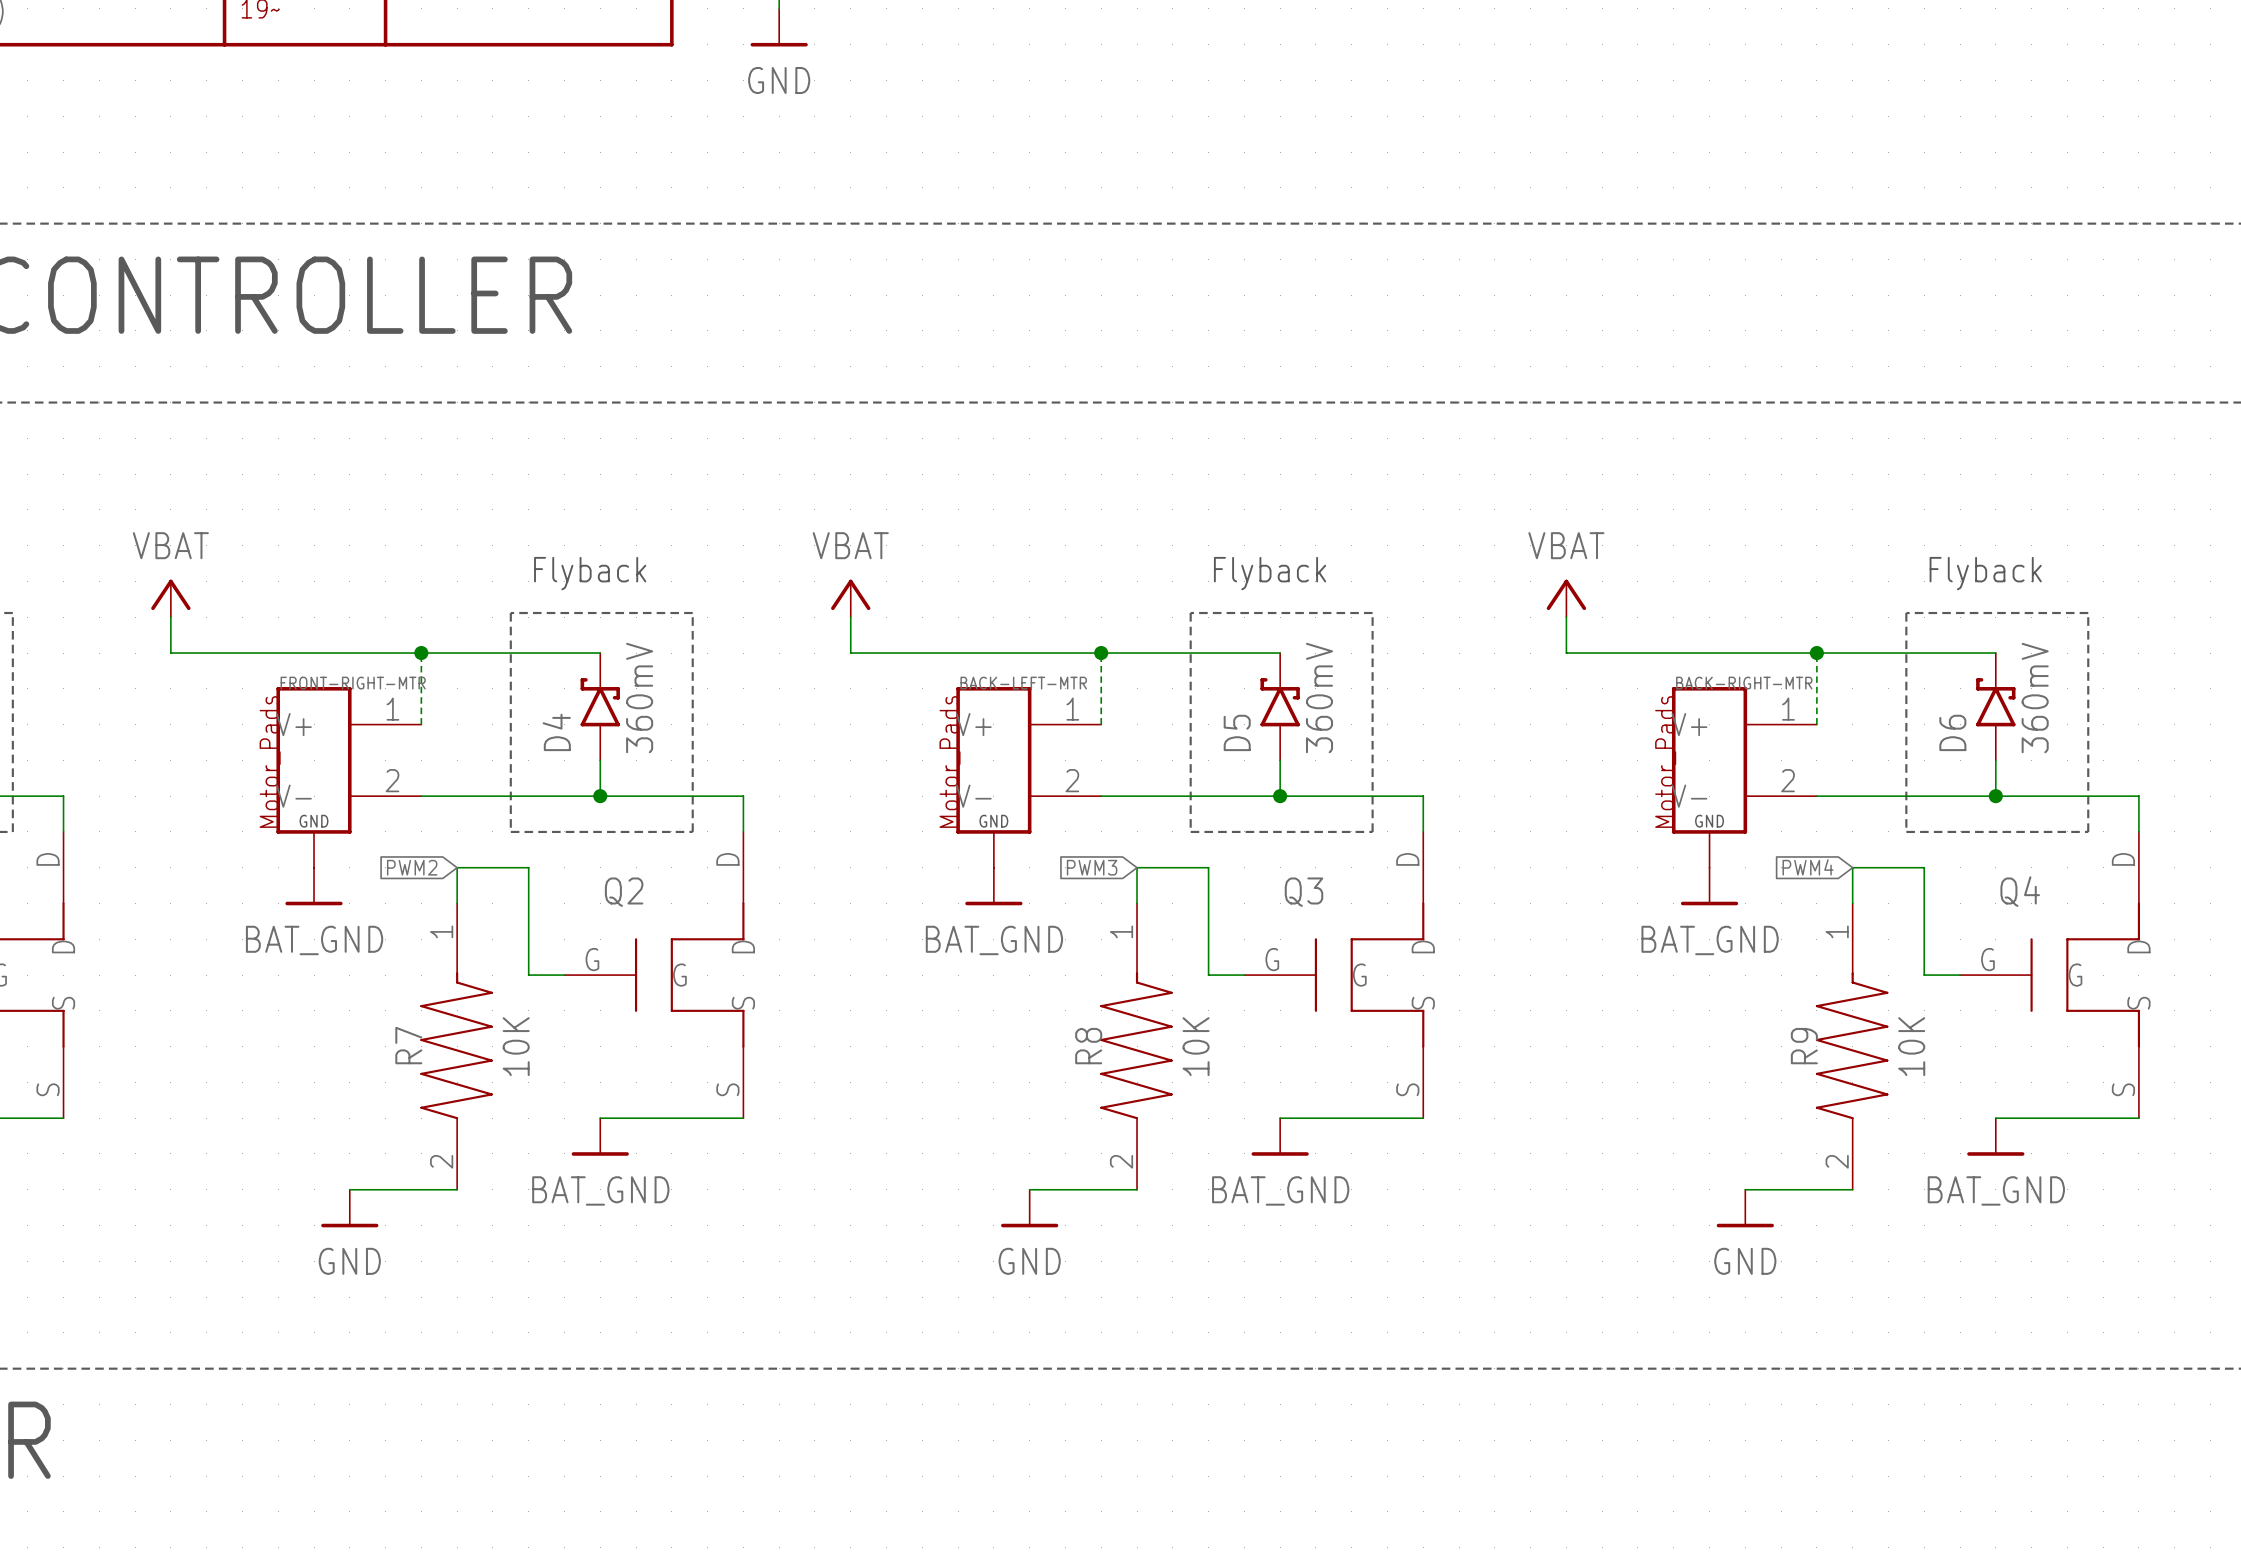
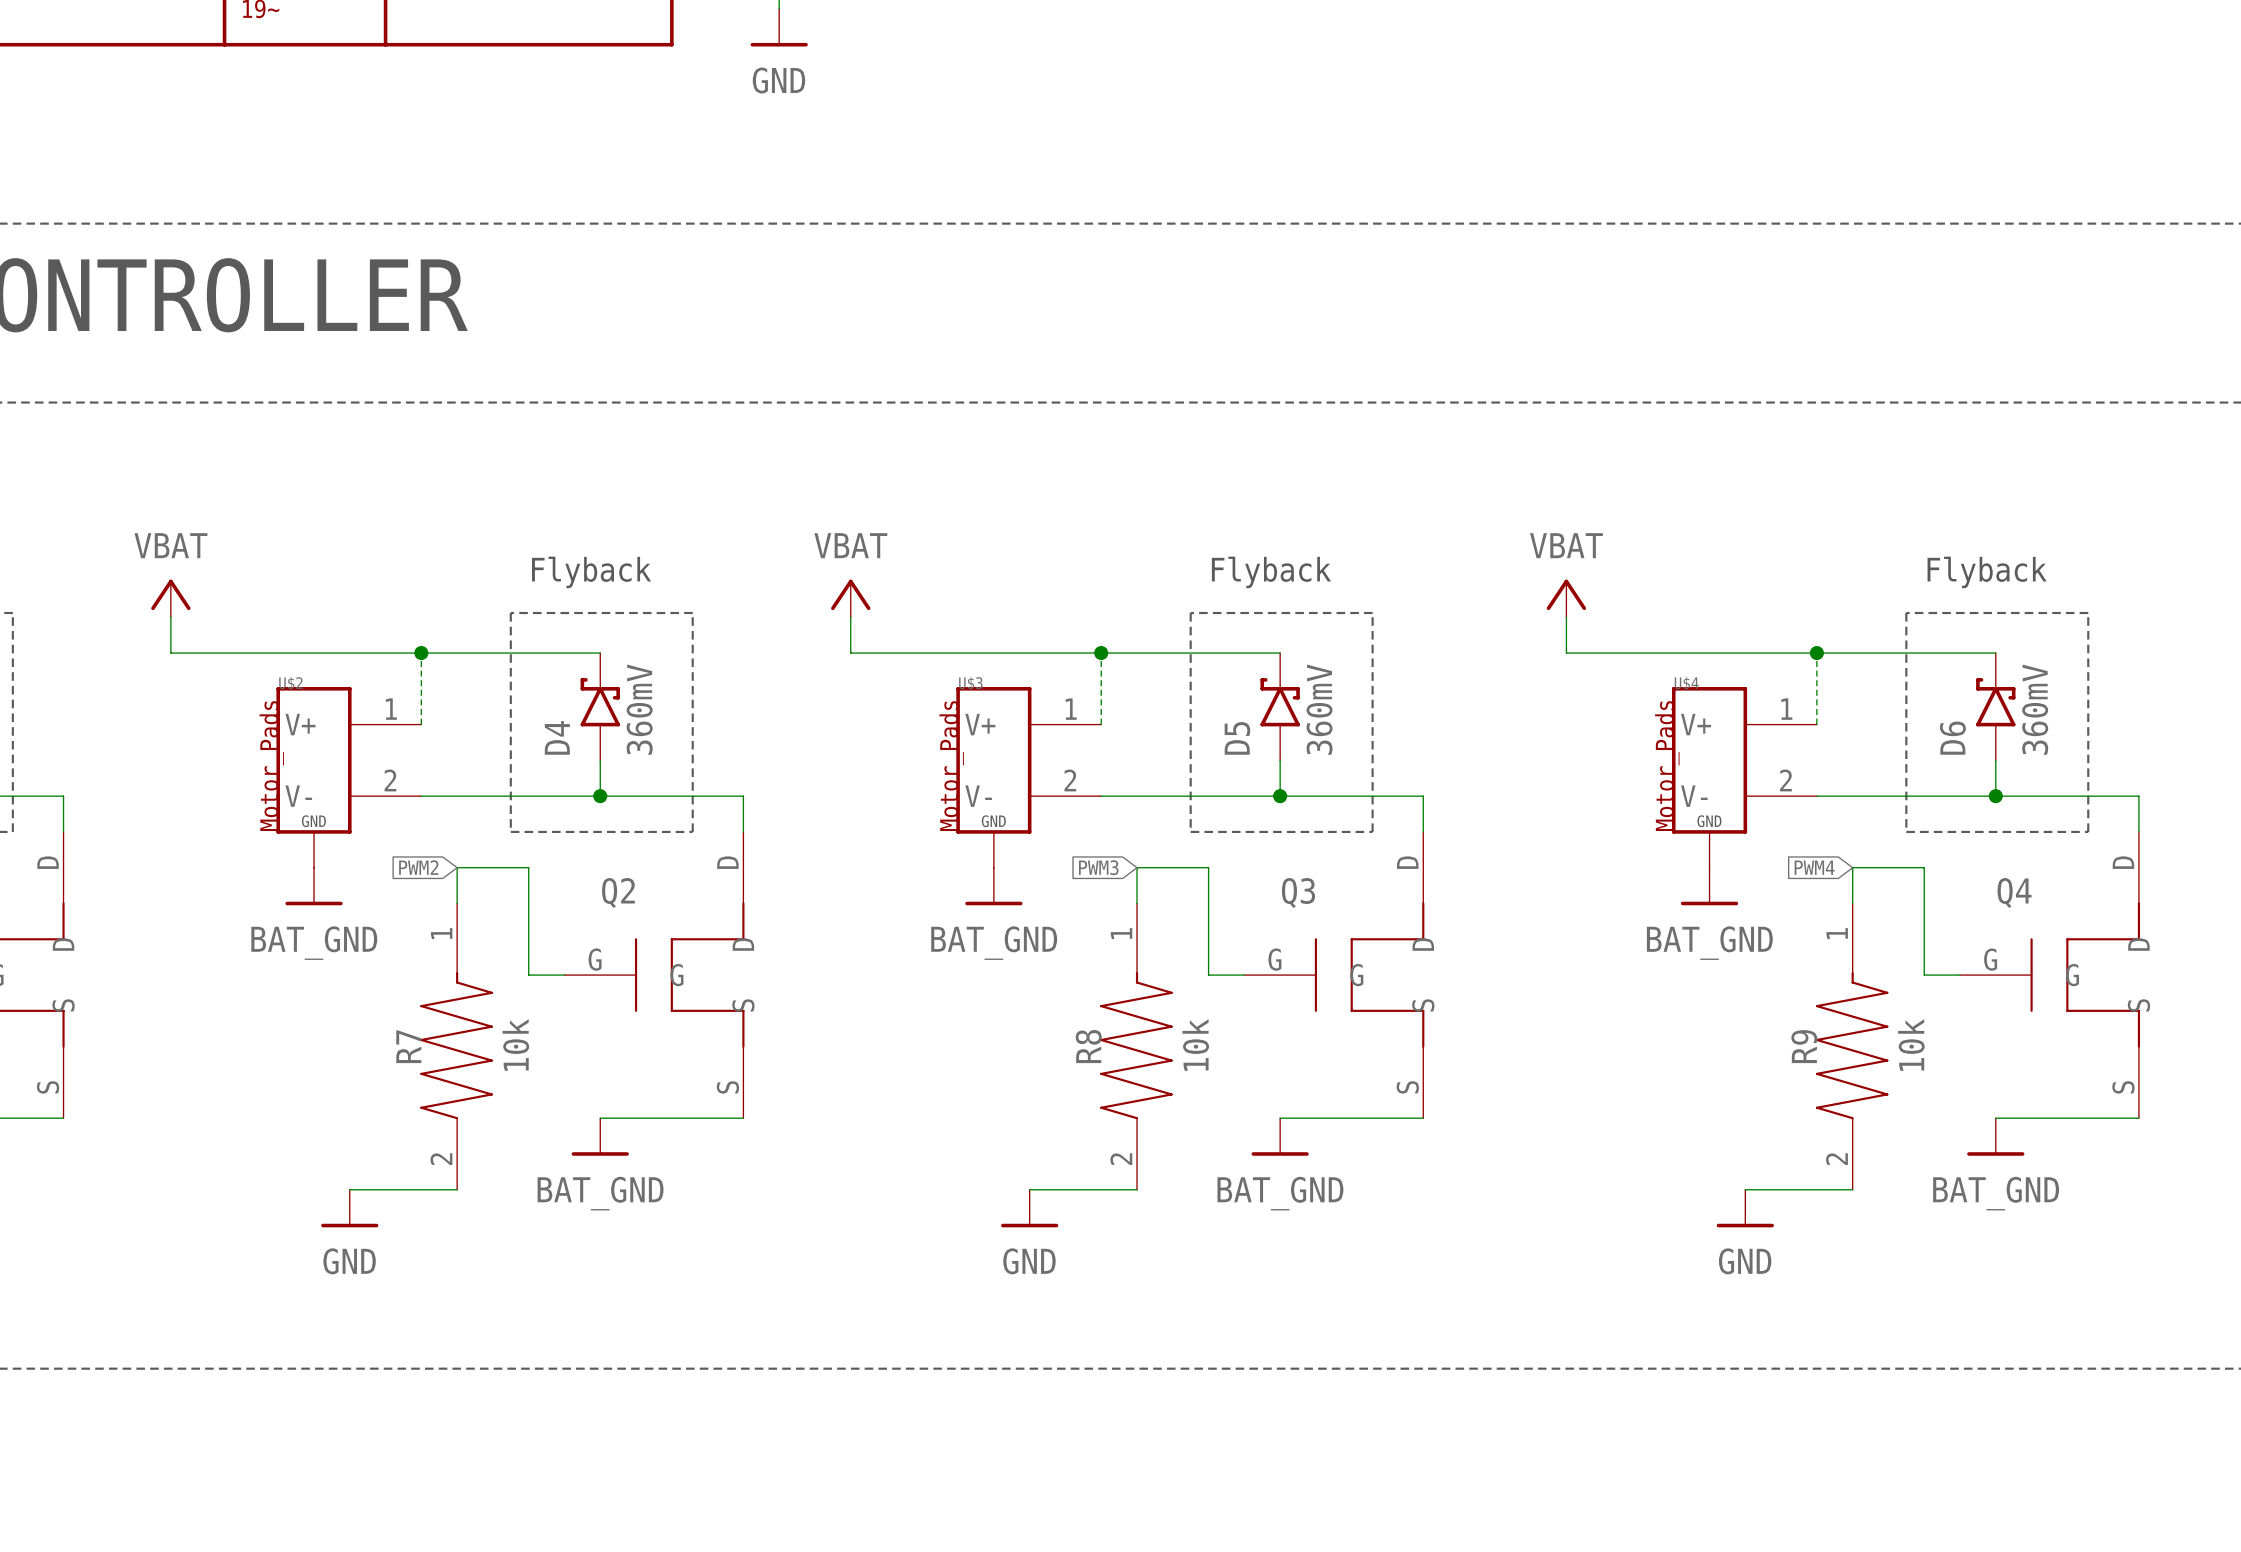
FRONT-RIGHT-MTR name: FRONT-RIGHT-MTR (353, 683) -> U$2 (290, 683)
BACK-LEFT-MTR name: BACK-LEFT-MTR (1023, 683) -> U$3 (970, 683)
BACK-RIGHT-MTR name: BACK-RIGHT-MTR (1744, 683) -> U$4 (1686, 683)
R7 value: 10K (516, 1046) -> 10k (515, 1045)
R8 value: 10K (1196, 1046) -> 10k (1195, 1045)
R9 value: 10K (1911, 1046) -> 10k (1911, 1045)

